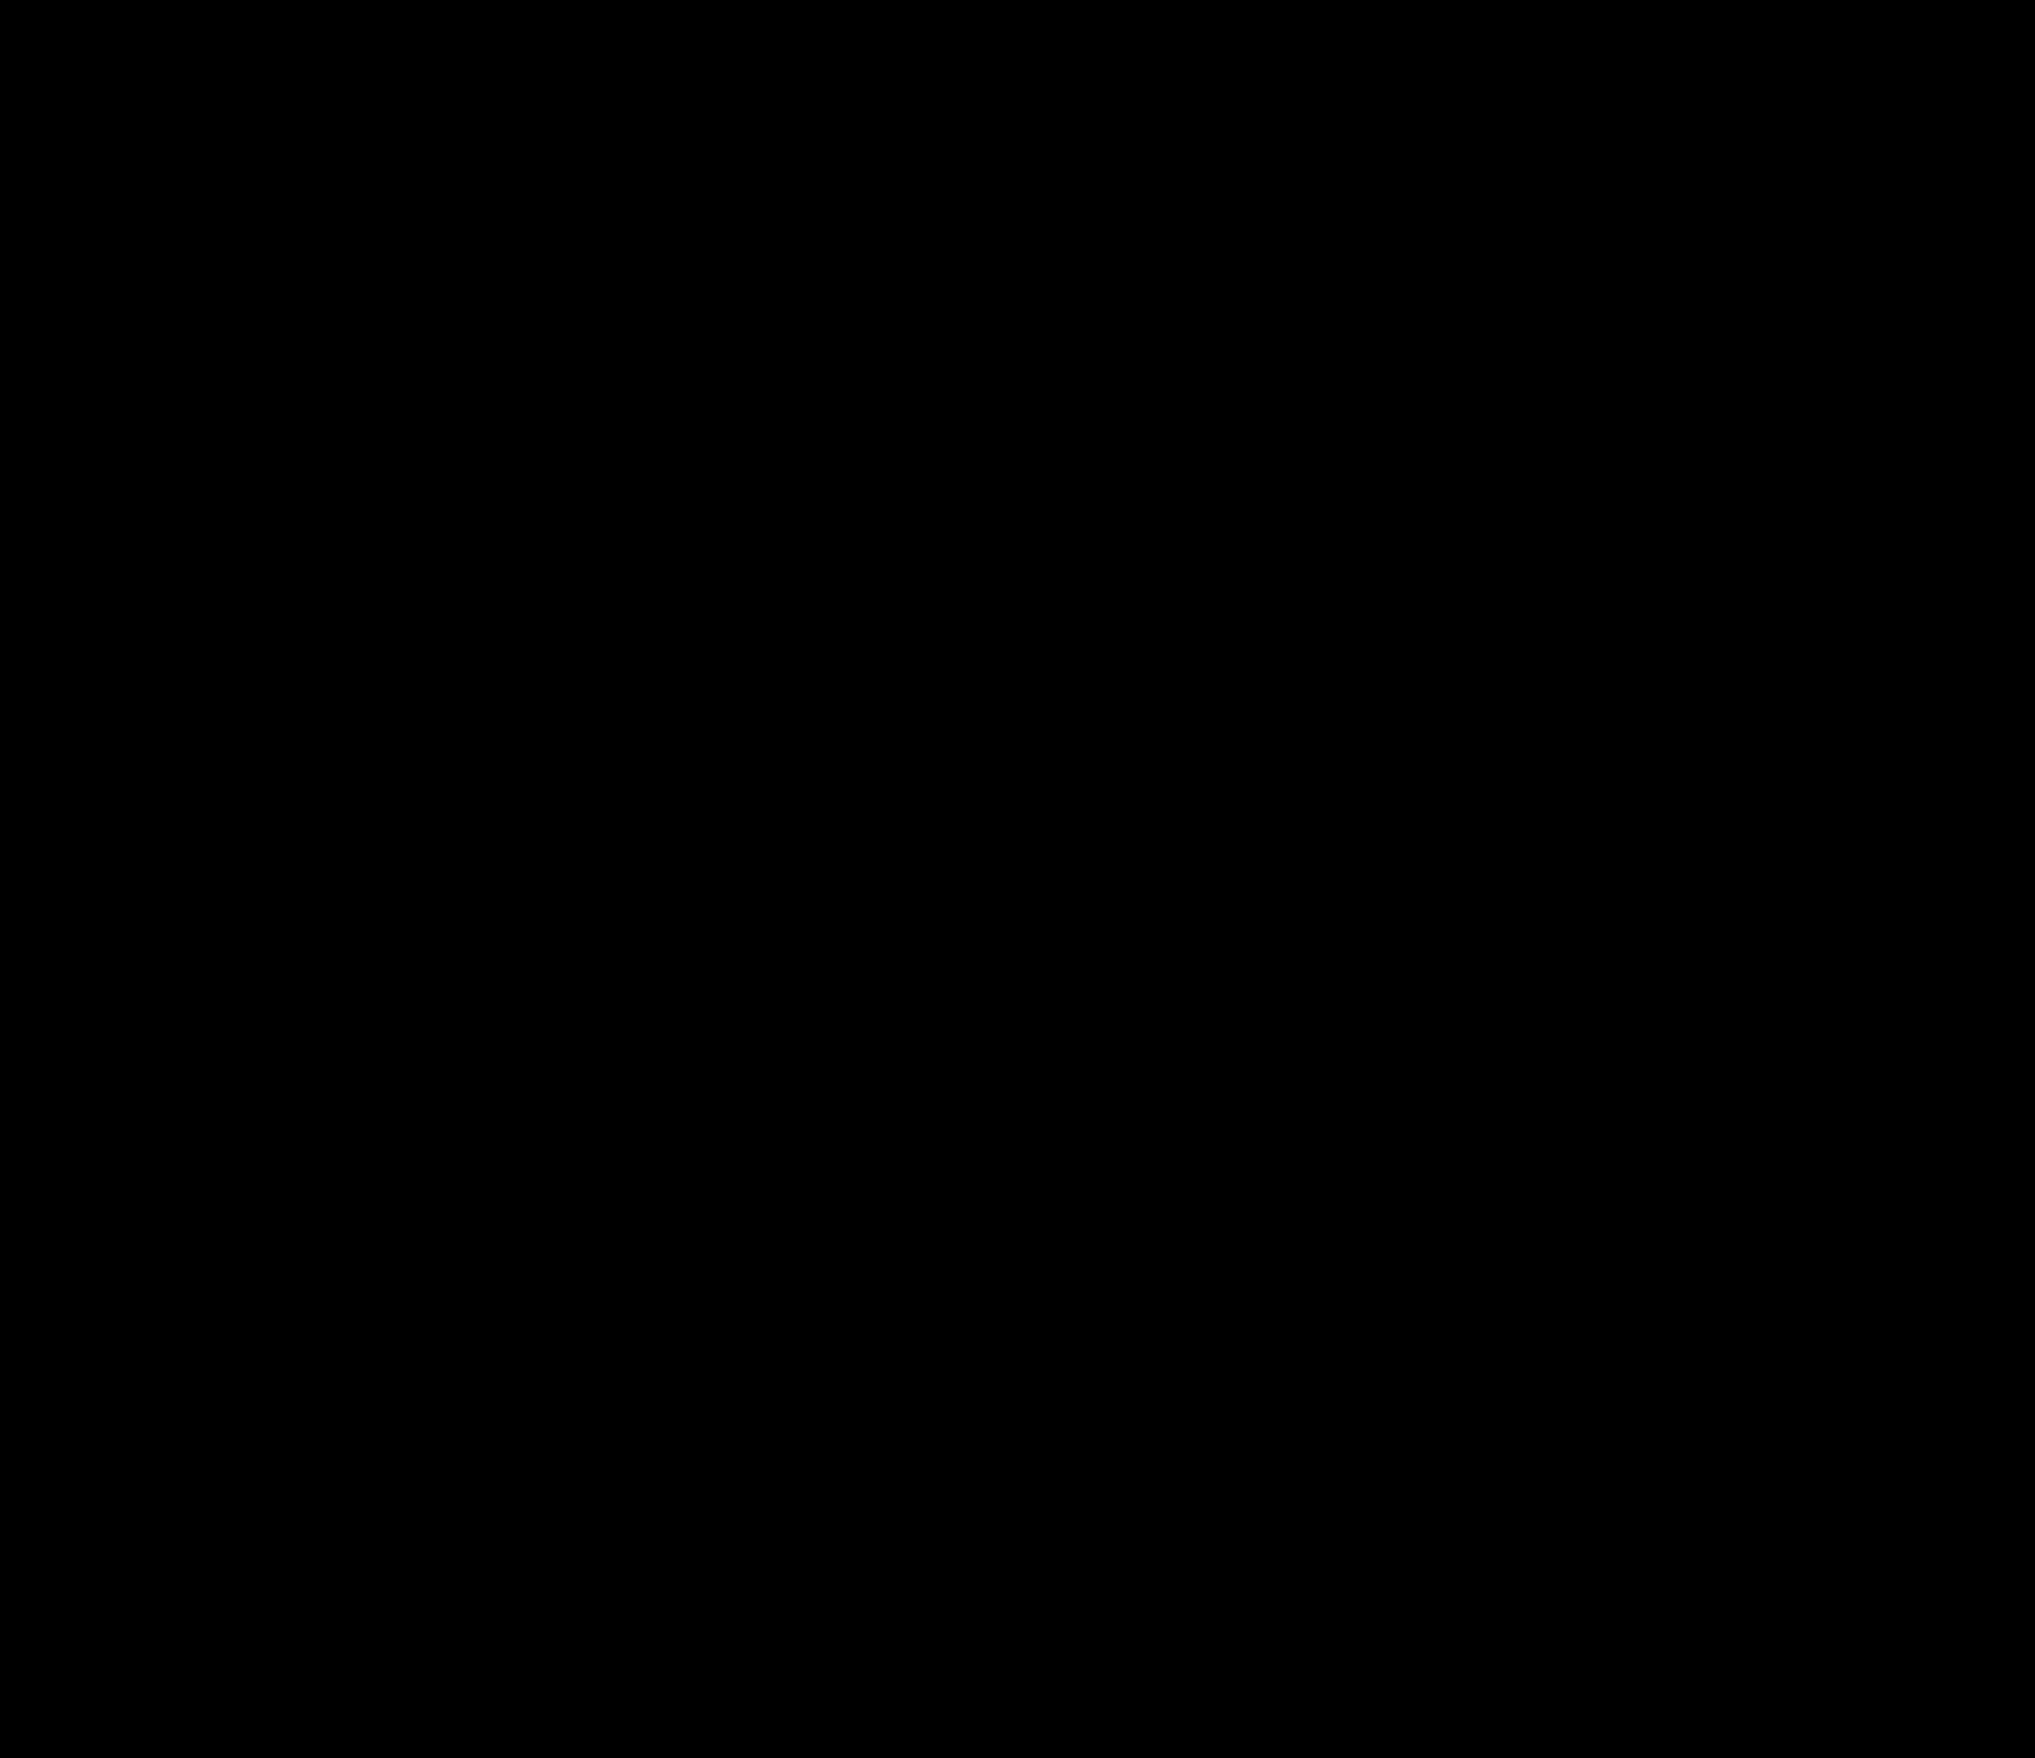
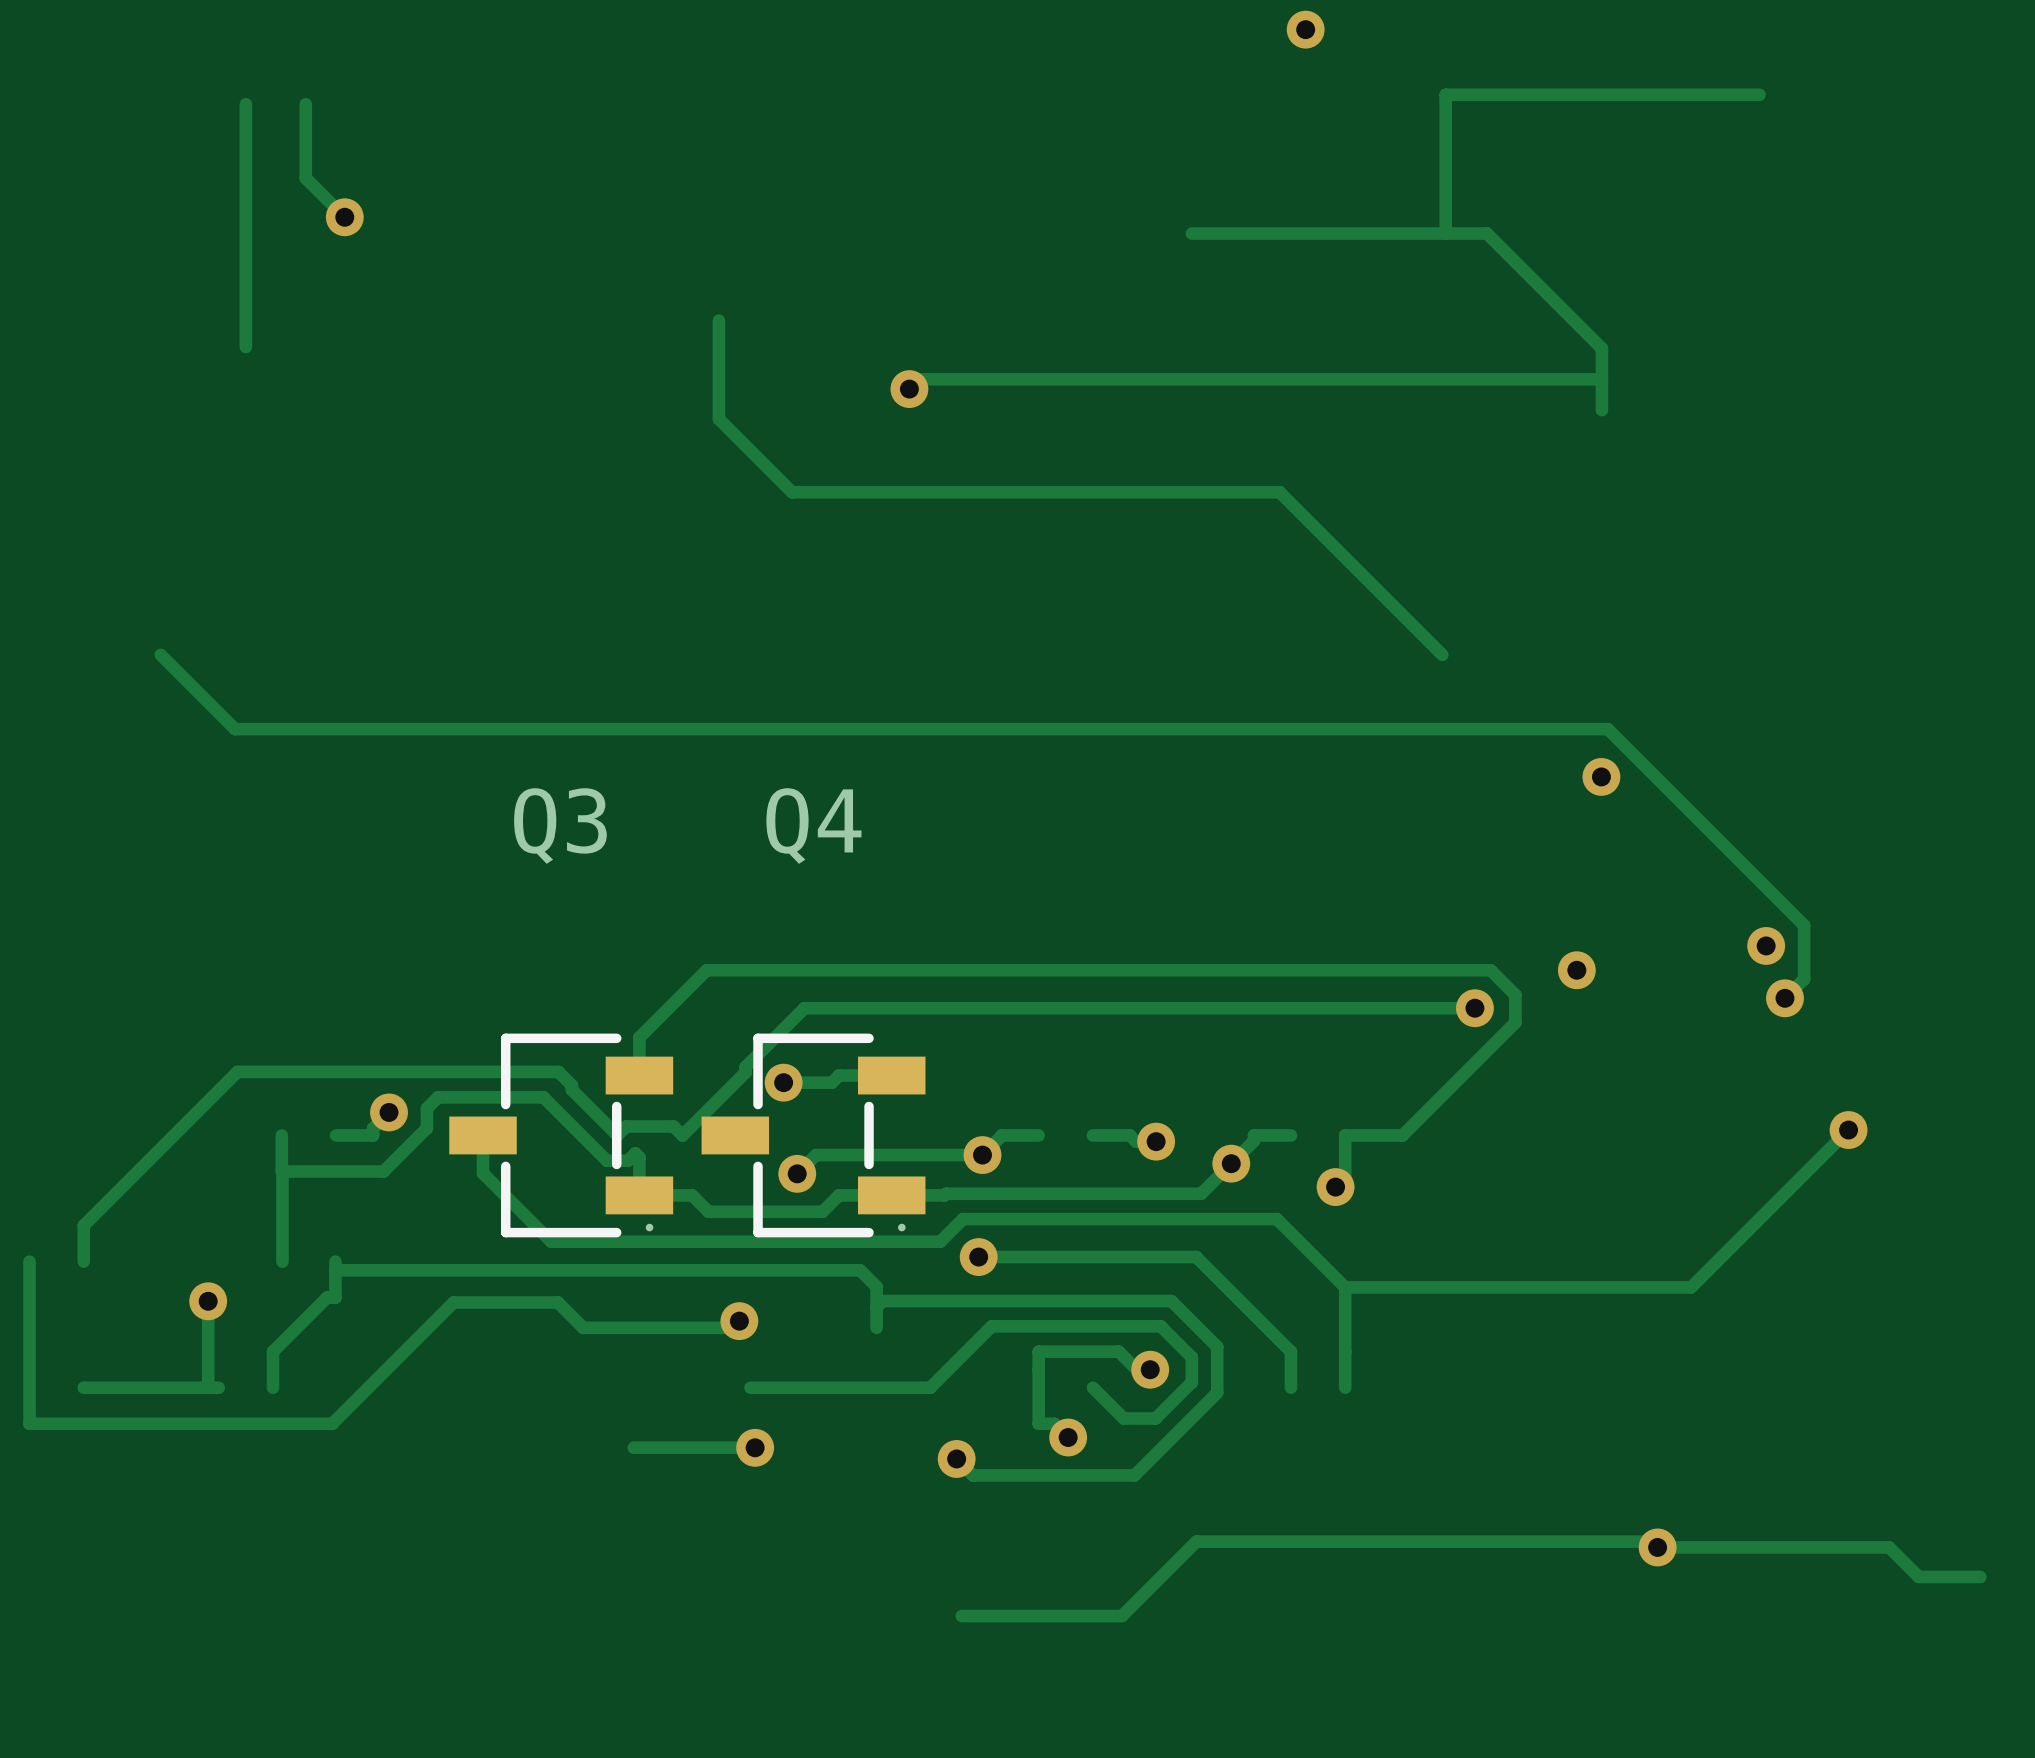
via: none -> (1305, 29)
track: none -> (1759, 94) (1445, 94) (1445, 233)
track: none -> (245, 104) (245, 347)
track: none -> (305, 104) (305, 178) (344, 217)
via: none -> (344, 217)
track: none -> (1191, 233) (1486, 233) (1601, 348) (1601, 410)
track: none -> (718, 320) (718, 419) (792, 492) (1279, 492) (1442, 654)
track: none -> (1601, 379) (919, 379) (909, 389)
via: none -> (909, 389)
track: none -> (160, 654) (235, 729) (1607, 729) (1804, 925) (1804, 979) (1784, 998)
via: none -> (1601, 776)
via: none -> (1766, 945)
via: none -> (1576, 970)
via: none -> (1784, 998)
track: none -> (1474, 1008) (804, 1008) (745, 1066) (745, 1072) (682, 1135) (673, 1126) (626, 1126) (617, 1135) (571, 1089) (571, 1085) (558, 1071) (237, 1071) (83, 1225) (83, 1261)
via: none -> (1474, 1008)
track: none -> (639, 1075) (639, 1037) (706, 970) (1490, 970) (1515, 994) (1515, 1022) (1402, 1135) (1345, 1135) (1345, 1177) (1335, 1187)
track: none -> (891, 1075) (838, 1075) (831, 1082) (783, 1082)
via: none -> (783, 1082)
track: none -> (389, 1112) (373, 1128) (373, 1135) (336, 1135)
via: none -> (389, 1112)
track: none -> (1848, 1130) (1691, 1287) (1345, 1287)
via: none -> (1848, 1130)
track: none -> (281, 1135) (281, 1171) (383, 1171) (426, 1128) (426, 1108) (437, 1097) (543, 1097) (606, 1160) (627, 1160) (635, 1153) (639, 1157) (639, 1195) (692, 1195) (708, 1211) (822, 1211) (838, 1195) (1201, 1193) (1253, 1140) (1253, 1135) (1290, 1135)
track: none -> (483, 1135) (483, 1173) (551, 1241) (940, 1241) (962, 1219) (1276, 1219) (1345, 1287)
Q3: none -> (561, 1135)
Q4: none -> (813, 1135)
track: none -> (1001, 1135) (1038, 1135)
track: none -> (1001, 1135) (982, 1155) (816, 1155) (797, 1173)
track: none -> (1092, 1135) (1129, 1135) (1136, 1141) (1156, 1141)
via: none -> (1156, 1141)
via: none -> (982, 1155)
via: none -> (1231, 1163)
track: none -> (282, 1171) (282, 1261)
via: none -> (797, 1173)
via: none -> (1335, 1187)
track: none -> (978, 1257) (1196, 1257) (1290, 1351) (1290, 1387)
via: none -> (978, 1257)
track: none -> (29, 1261) (29, 1423) (332, 1423) (453, 1302) (557, 1302) (583, 1327) (732, 1327) (739, 1321)
track: none -> (335, 1261) (335, 1297) (327, 1297) (272, 1351) (272, 1387)
track: none -> (335, 1270) (860, 1270) (876, 1286) (876, 1327)
track: none -> (1345, 1287) (1345, 1387)
track: none -> (208, 1301) (208, 1387)
via: none -> (208, 1301)
track: none -> (876, 1307) (882, 1301) (1171, 1301) (1217, 1346) (1217, 1392) (1134, 1475) (973, 1475) (956, 1458)
via: none -> (739, 1321)
track: none -> (1150, 1369) (1136, 1369) (1118, 1351) (1038, 1351) (1038, 1423) (1054, 1423) (1068, 1437)
via: none -> (1150, 1369)
track: none -> (83, 1387) (218, 1387)
track: none -> (750, 1387) (930, 1387) (991, 1326) (1160, 1326) (1191, 1357) (1191, 1382) (1155, 1418) (1123, 1418) (1092, 1387)
via: none -> (1068, 1437)
track: none -> (633, 1447) (754, 1447)
via: none -> (755, 1447)
via: none -> (956, 1458)
via: none -> (1657, 1547)
track: none -> (1980, 1576) (1918, 1576) (1889, 1547) (1657, 1547) (1651, 1541) (1196, 1541) (1121, 1616) (961, 1616)

